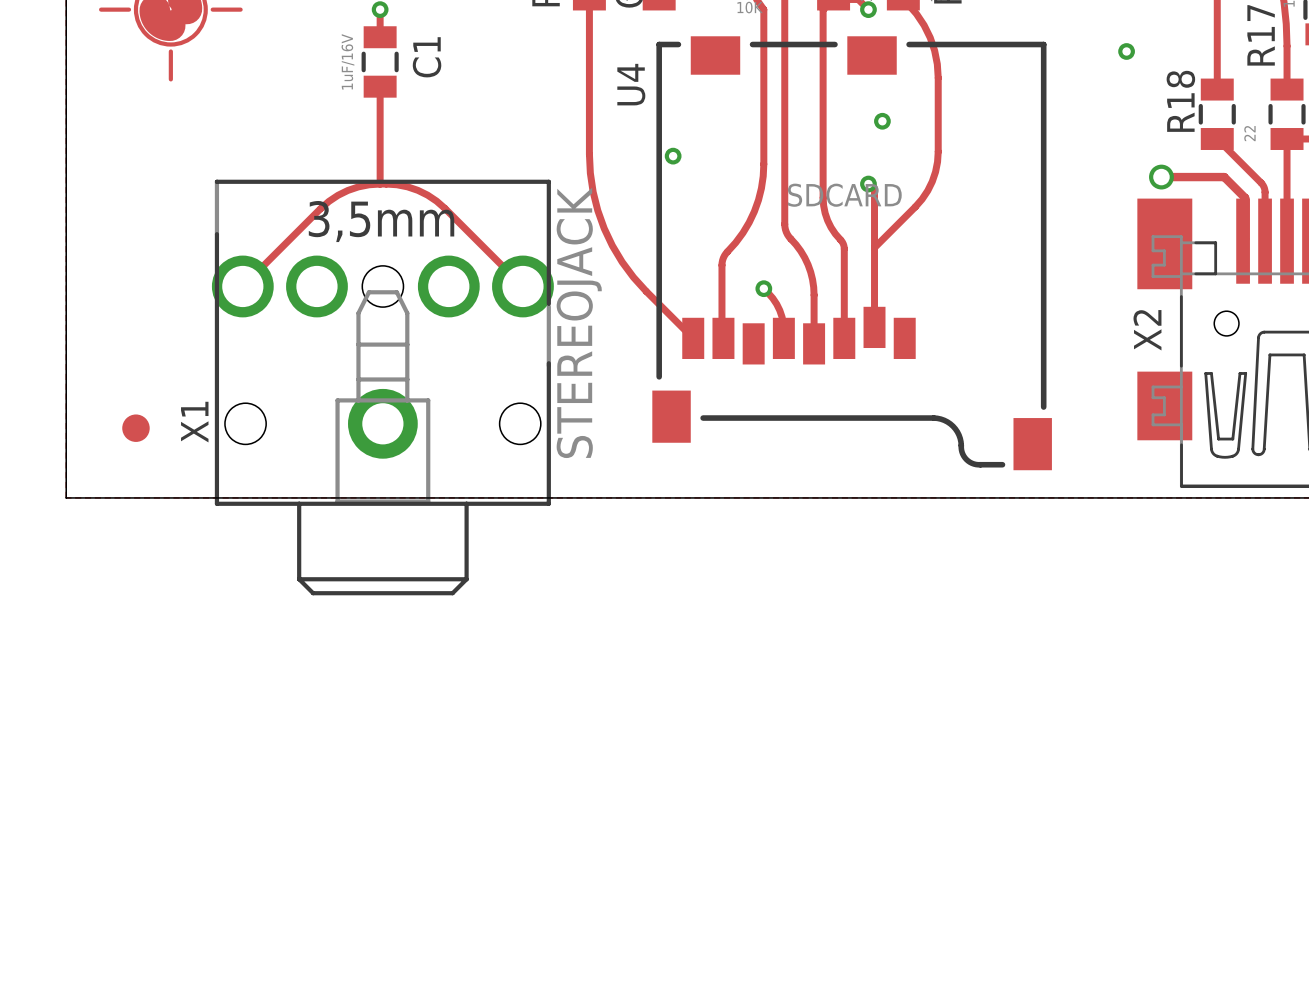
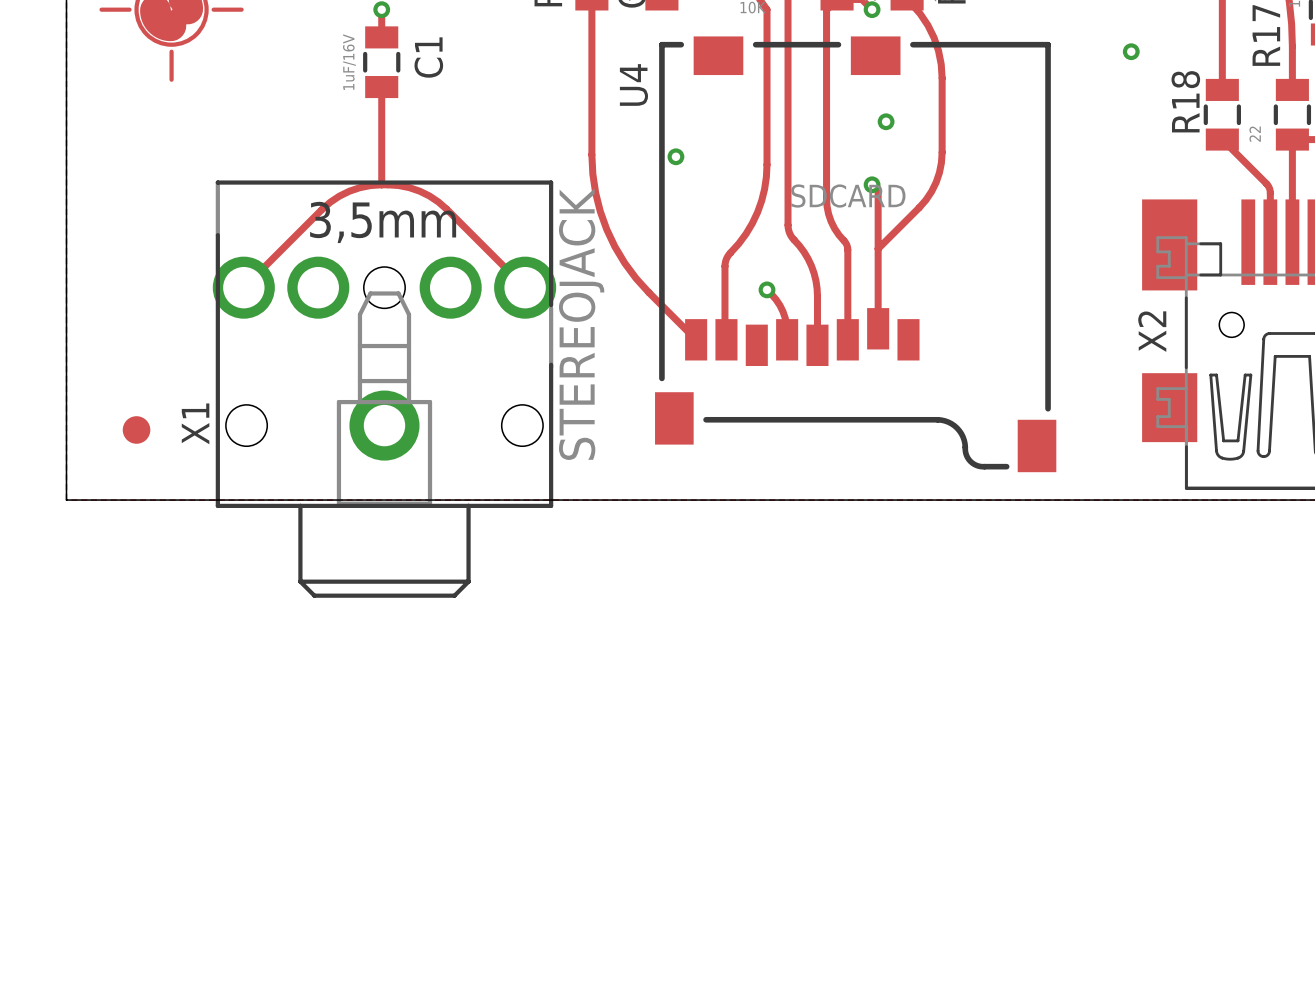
track: (1161, 177) (1224, 177) (1245, 197) (1245, 239) (1243, 241) -> none
via: (1161, 177) -> none

